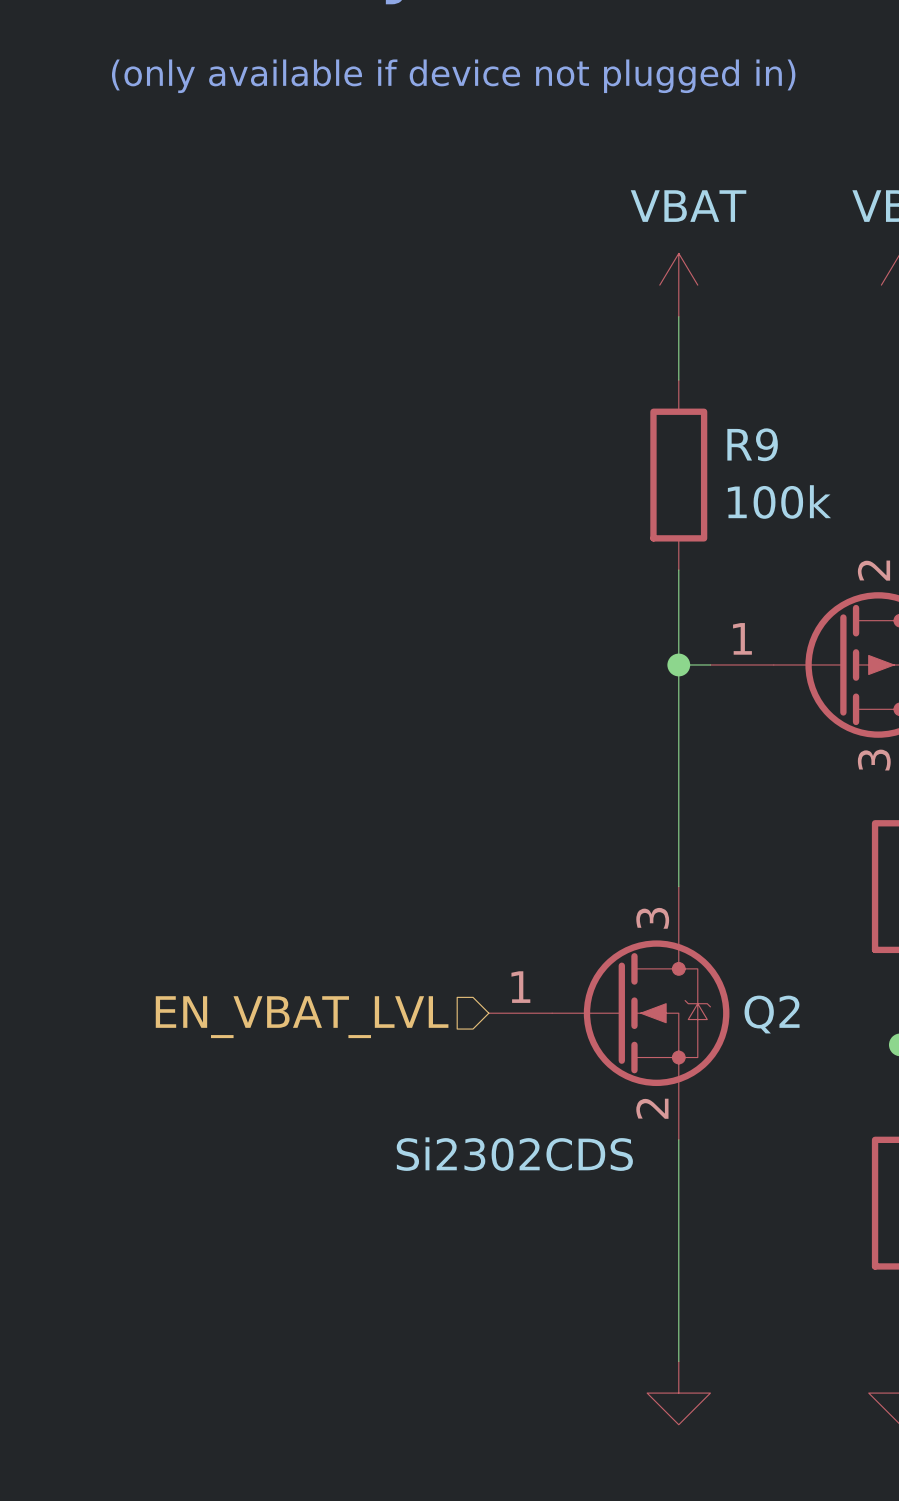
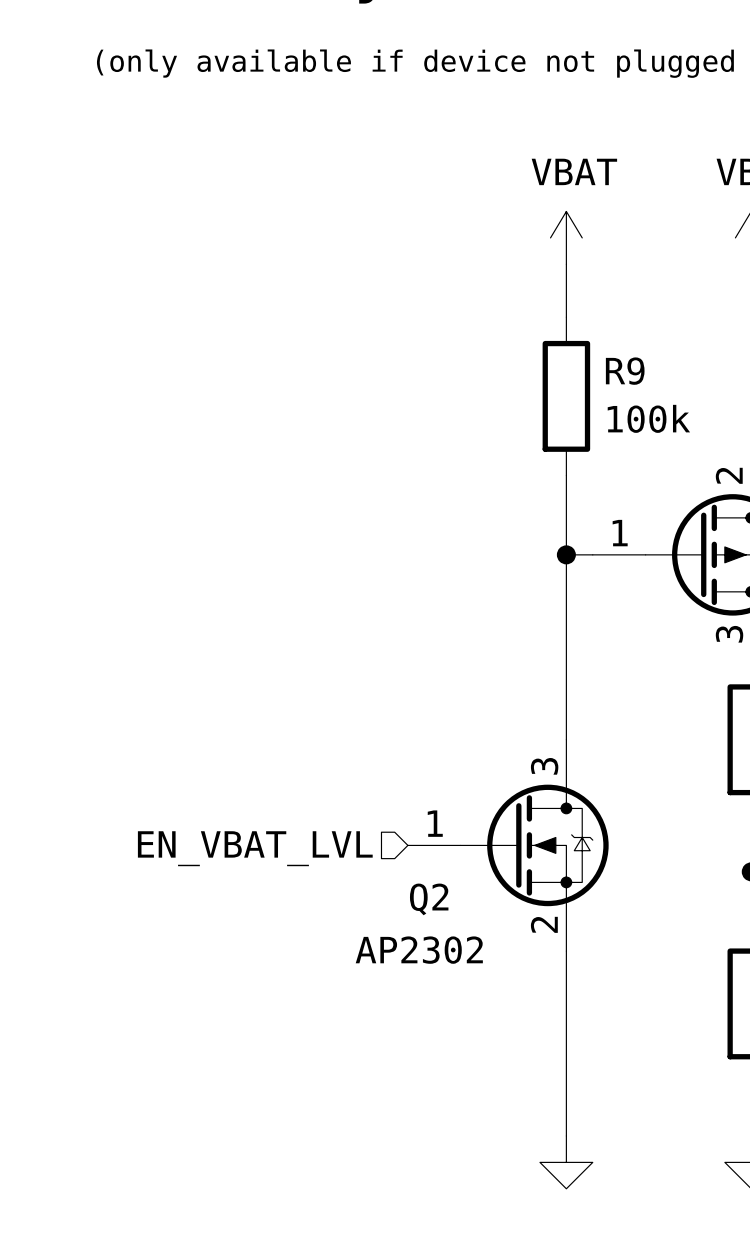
Q2 name position: Q2 (772, 1014) -> Q2 (429, 899)
Q2 value: Si2302CDS (514, 1154) -> AP2302 (419, 950)

